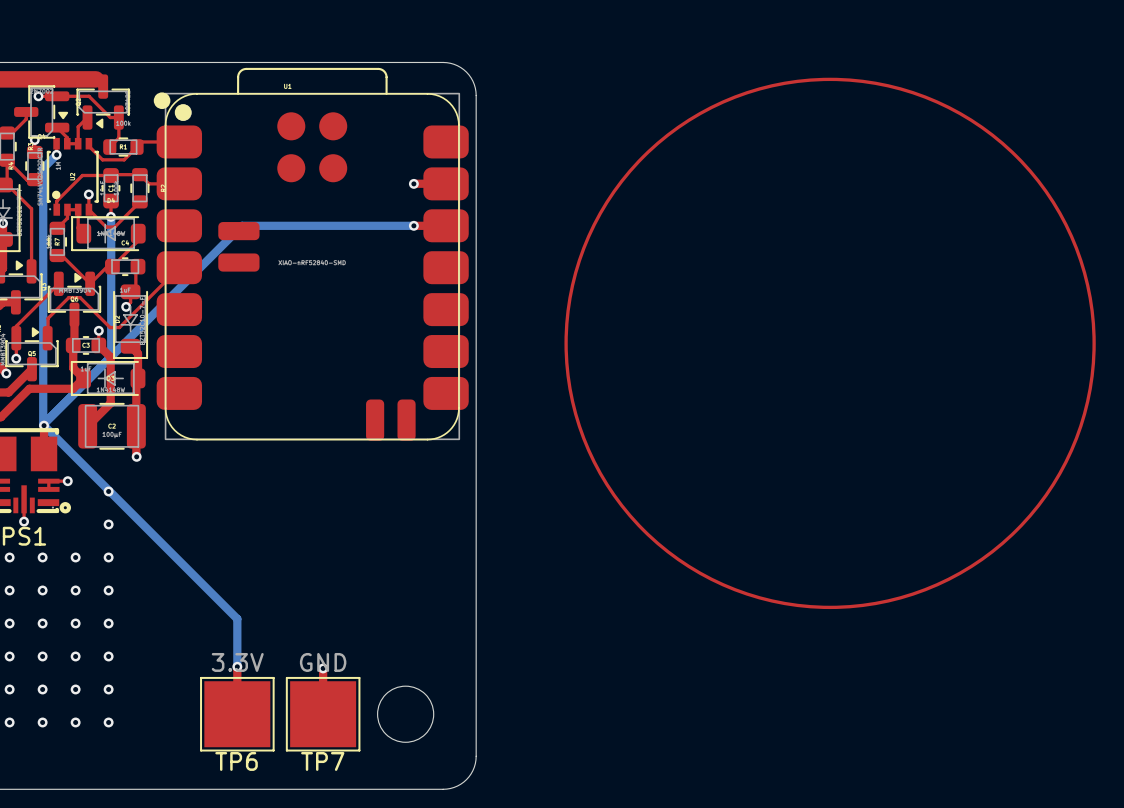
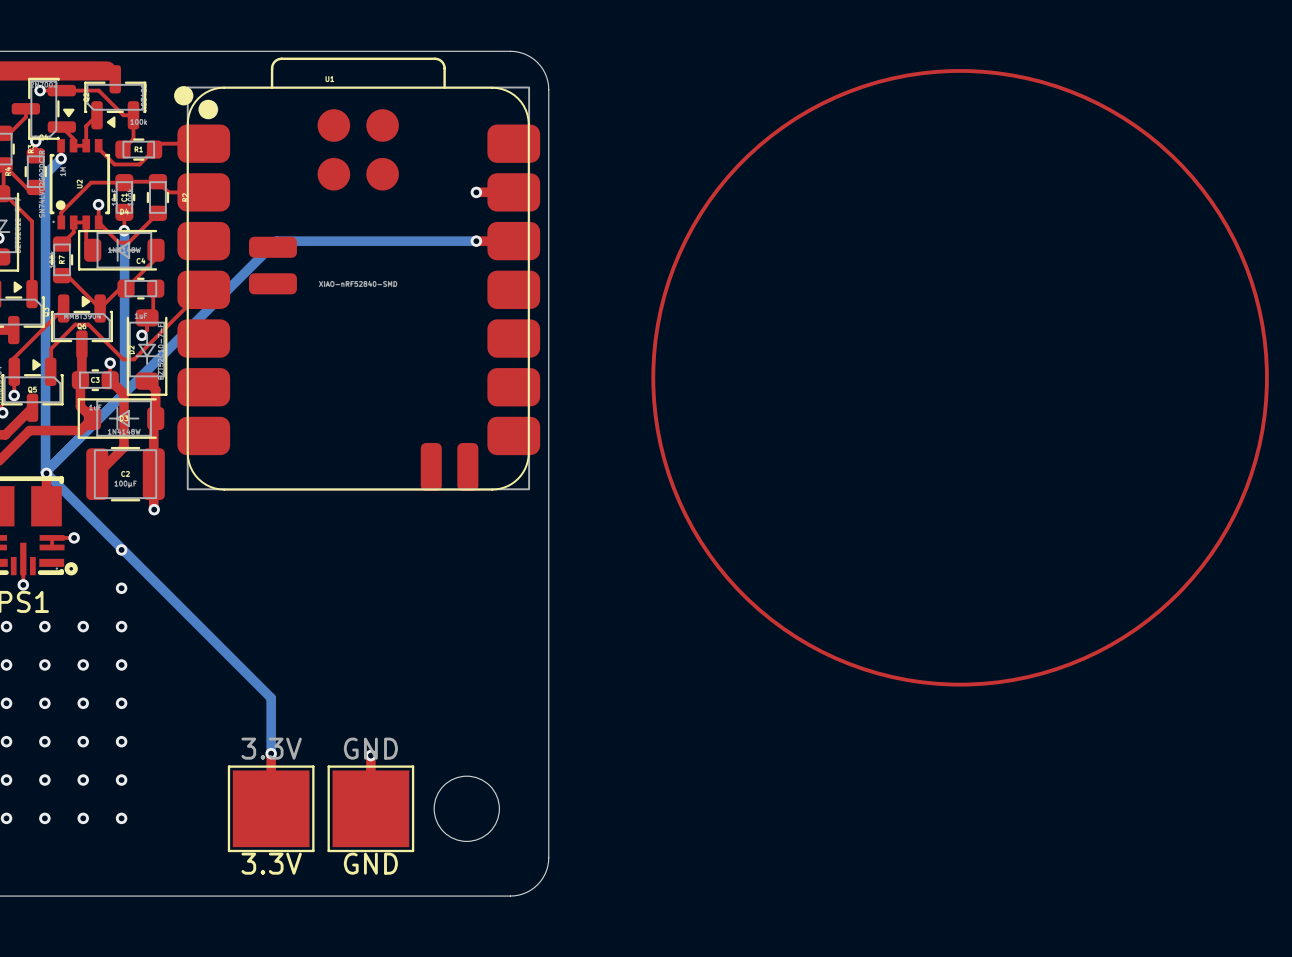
TP6 name: TP6 (236, 761) -> 3.3V (271, 863)
TP7 name: TP7 (322, 761) -> GND (370, 863)

